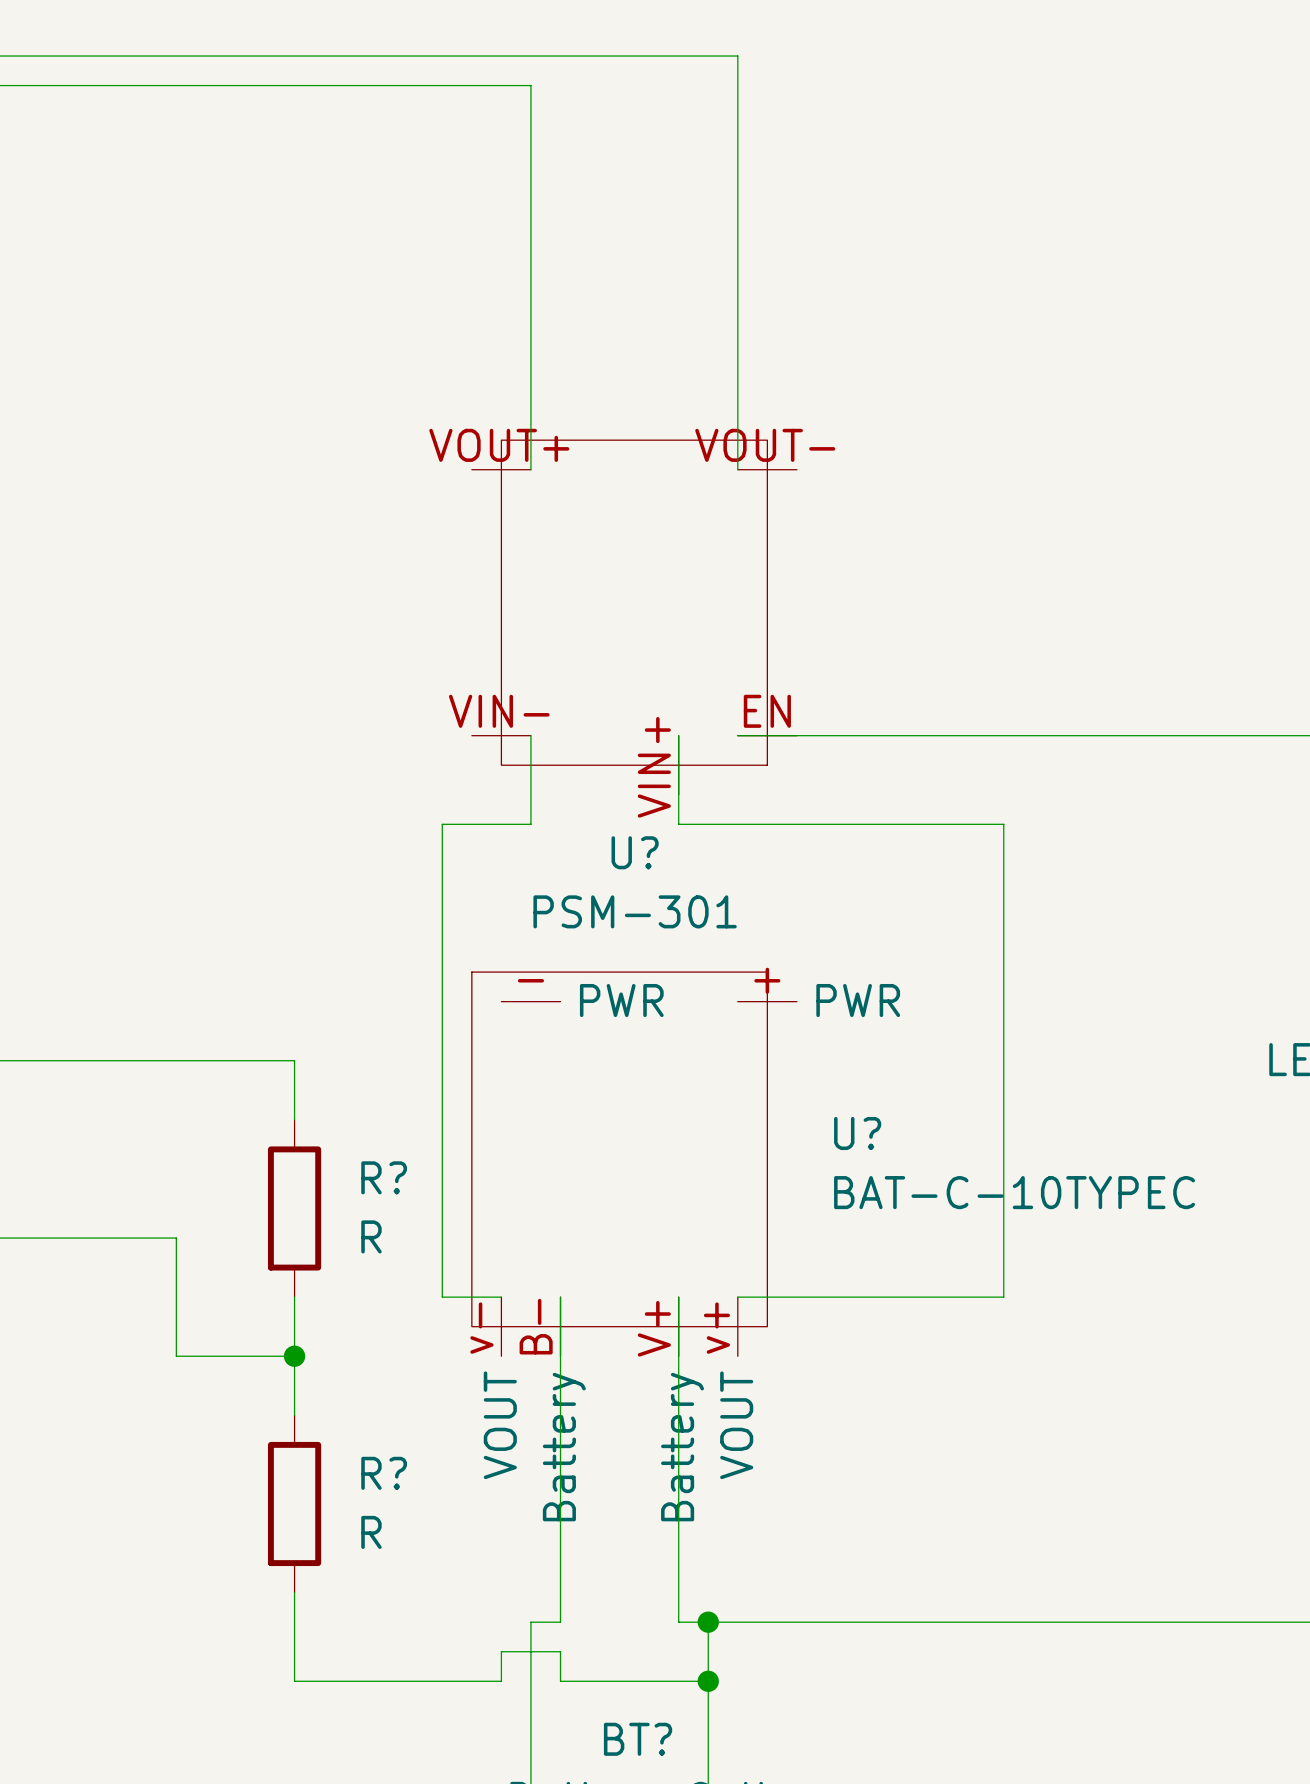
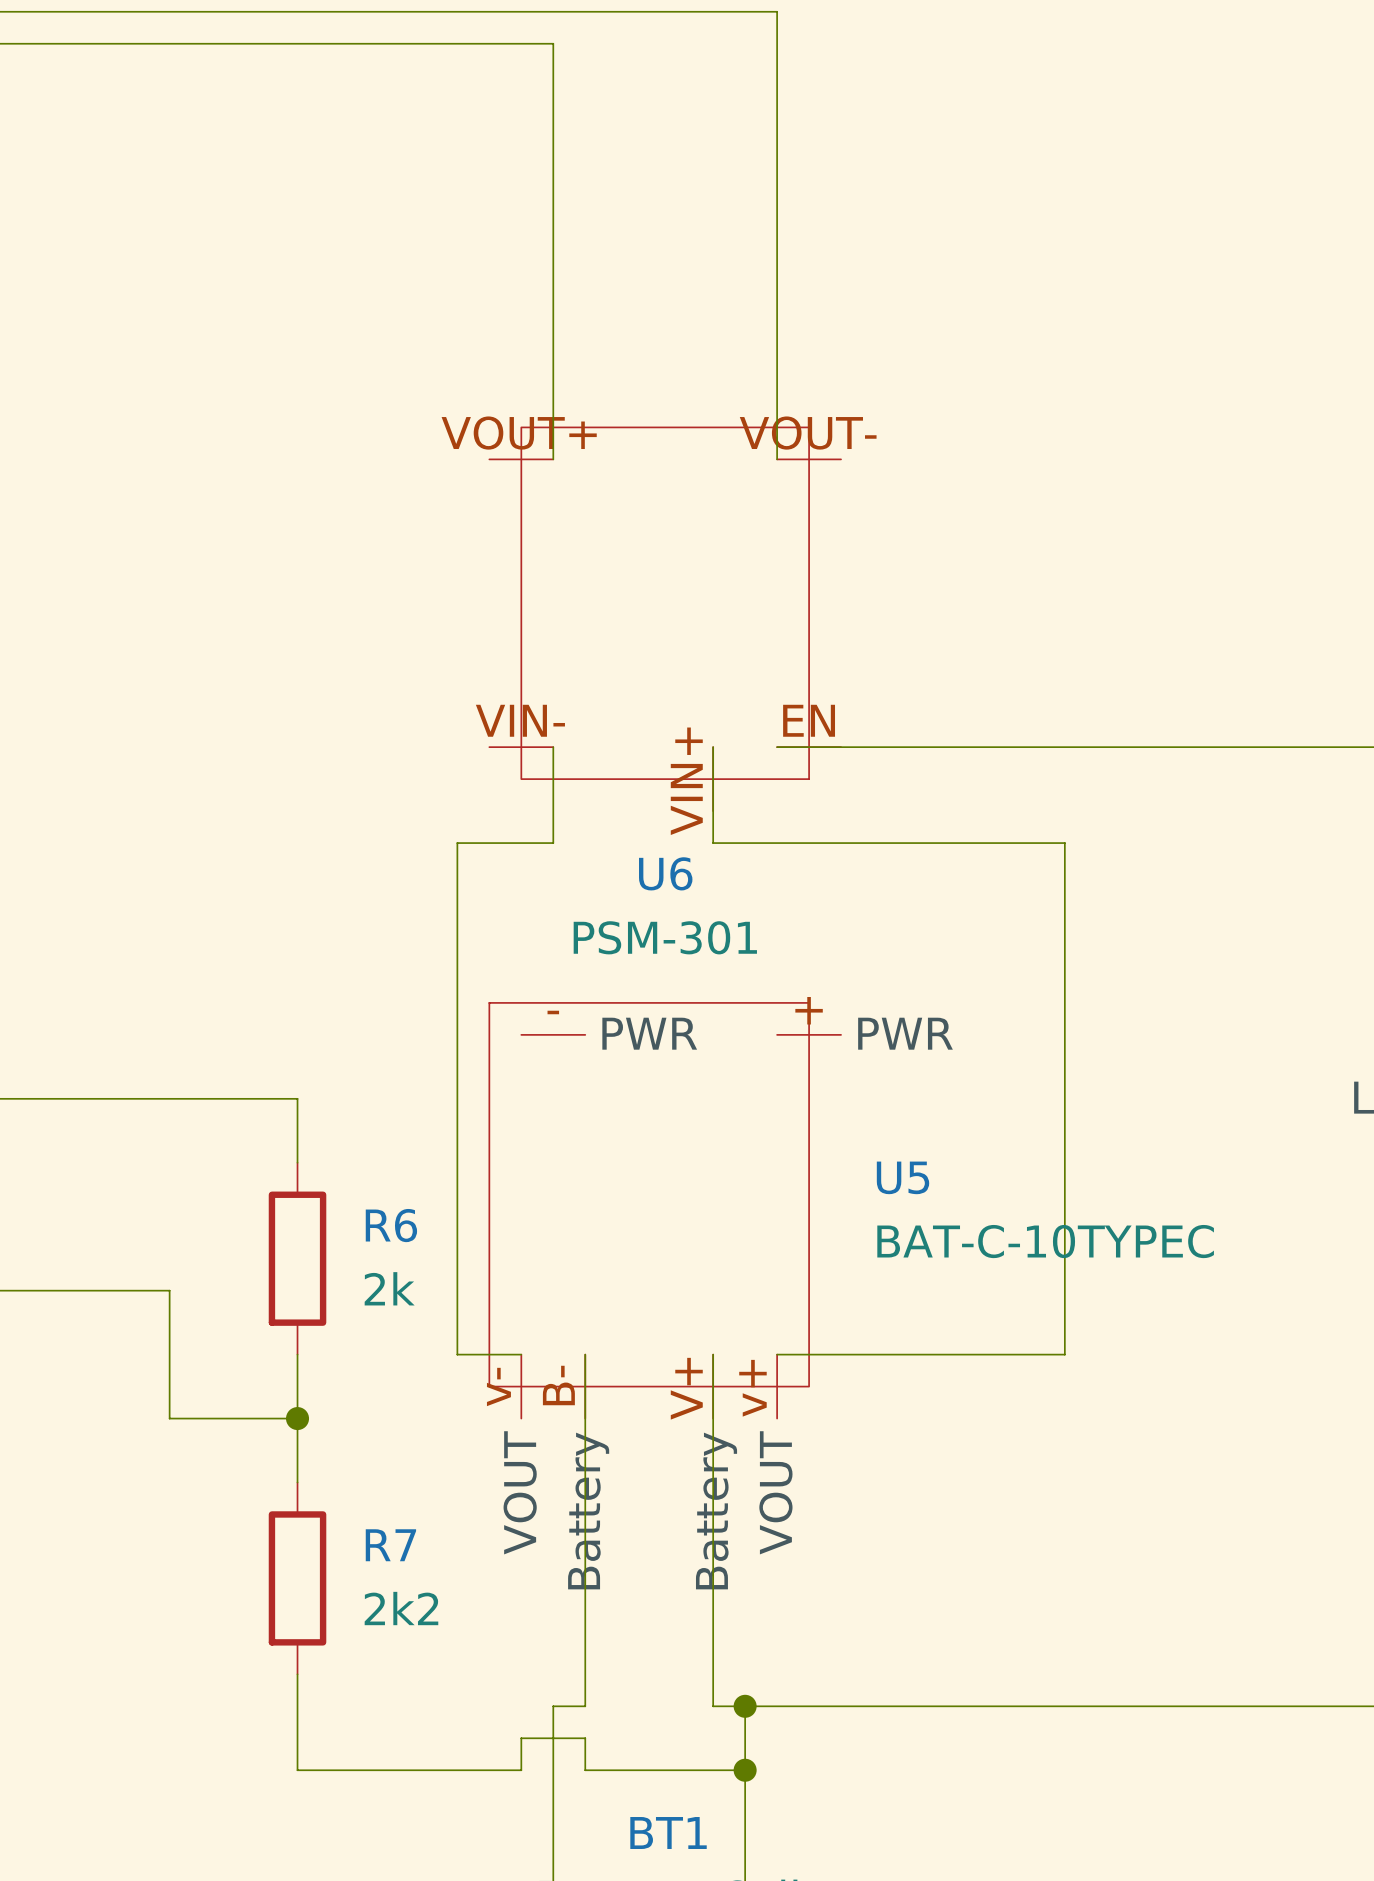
U? name: U? (635, 852) -> U6 (665, 873)
U? name: U? (857, 1133) -> U5 (903, 1177)
R? name: R? (384, 1177) -> R6 (391, 1225)
R? value: R (371, 1236) -> 2k (389, 1288)
R? name: R? (384, 1473) -> R7 (390, 1545)
R? value: R (371, 1532) -> 2k2 (401, 1608)
BT? name: BT? (638, 1739) -> BT1 (668, 1833)

